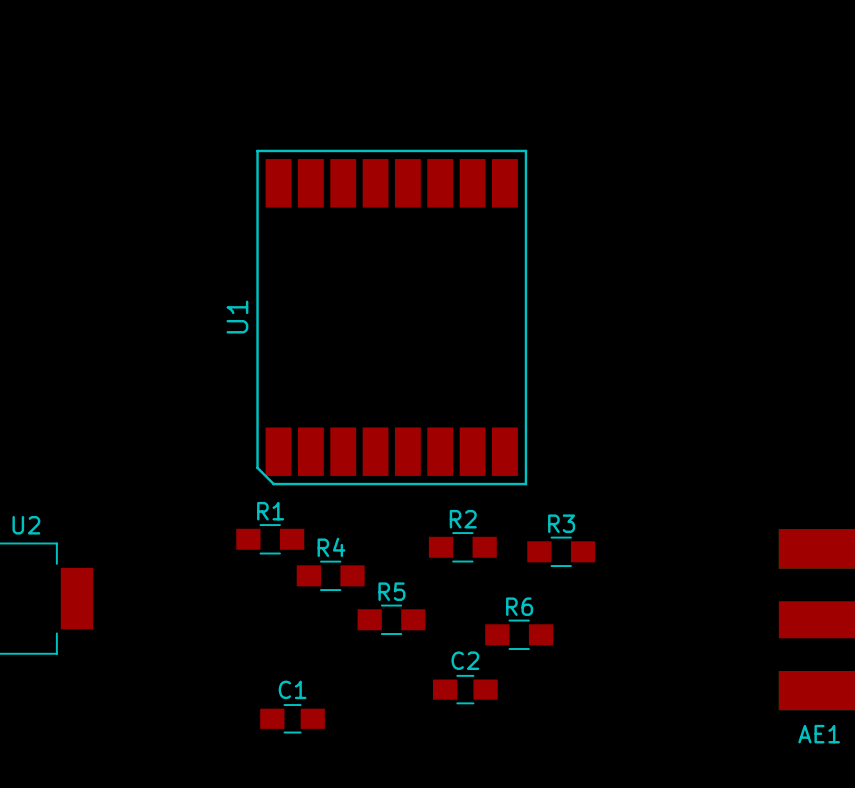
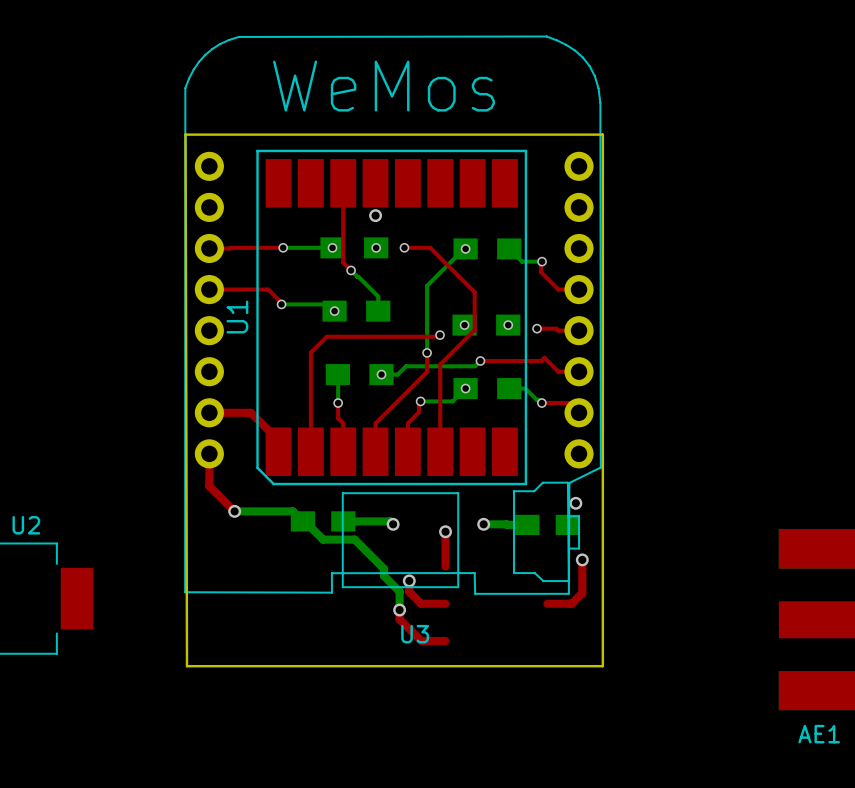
board edge: none -> (185, 134) (186, 666) (602, 666) (602, 134) (185, 134)
top track: none -> (343, 183) (343, 262) (351, 270)
via: none -> (375, 215)
bottom track: none -> (283, 247) (332, 247)
top track: none -> (283, 247) (209, 248)
via: none -> (283, 247)
via: none -> (332, 247)
via: none -> (376, 247)
top track: none -> (404, 247) (430, 247) (474, 292) (474, 329) (440, 364) (440, 451)
via: none -> (404, 247)
bottom track: none -> (465, 248) (427, 285) (427, 352)
via: none -> (465, 248)
bottom track: none -> (509, 248) (521, 261) (542, 261)
top track: none -> (542, 261) (541, 272) (558, 289) (579, 289)
via: none -> (542, 261)
bottom track: none -> (351, 270) (378, 296) (378, 311)
via: none -> (351, 270)
top track: none -> (209, 289) (268, 289) (281, 304)
bottom track: none -> (281, 304) (327, 304) (334, 311)
via: none -> (281, 304)
via: none -> (334, 311)
U3: none -> (392, 315)
via: none -> (464, 325)
via: none -> (508, 325)
top track: none -> (537, 328) (579, 330)
via: none -> (537, 328)
top track: none -> (440, 335) (438, 336) (326, 336) (310, 352) (310, 451)
via: none -> (440, 335)
top track: none -> (427, 352) (427, 371) (375, 423) (375, 451)
via: none -> (427, 352)
bottom track: none -> (480, 361) (475, 366) (405, 366) (397, 374) (381, 374)
top track: none -> (480, 361) (541, 361) (544, 357) (558, 371) (579, 371)
via: none -> (480, 361)
bottom track: none -> (337, 374) (338, 403)
via: none -> (381, 374)
bottom track: none -> (465, 388) (452, 401) (420, 401)
via: none -> (465, 388)
bottom track: none -> (509, 388) (525, 388) (541, 403)
top track: none -> (420, 401) (419, 412) (407, 423) (407, 451)
via: none -> (420, 401)
top track: none -> (338, 403) (338, 418) (343, 423) (343, 451)
via: none -> (338, 403)
top track: none -> (541, 403) (569, 403) (579, 412)
via: none -> (541, 403)
top track: none -> (209, 412) (250, 412) (278, 440) (278, 451)
top track: none -> (209, 453) (209, 486) (234, 511)
via: none -> (575, 503)
bottom track: none -> (234, 511) (292, 511) (323, 539) (354, 539) (384, 568) (384, 576) (399, 591) (399, 610)
via: none -> (234, 511)
bottom track: none -> (343, 521) (390, 521) (393, 524)
via: none -> (393, 524)
bottom track: none -> (483, 524) (527, 524)
via: none -> (483, 524)
top track: none -> (445, 531) (445, 566)
via: none -> (445, 531)
R1 side: top (270, 539) -> bottom (356, 311)
R2 side: top (462, 547) -> bottom (354, 247)
R3 side: top (561, 551) -> bottom (487, 388)
top track: none -> (582, 559) (582, 593) (571, 603) (547, 603)
via: none -> (582, 559)
R4 side: top (330, 575) -> bottom (487, 248)
top track: none -> (409, 580) (409, 591) (421, 603) (445, 603)
via: none -> (409, 580)
top track: none -> (399, 610) (399, 619) (421, 640) (445, 640)
via: none -> (399, 610)
R5 side: top (391, 619) -> bottom (486, 325)
R6 side: top (519, 634) -> bottom (359, 374)
C2 side: top (465, 689) -> bottom (547, 524)
C1 side: top (292, 718) -> bottom (323, 521)

